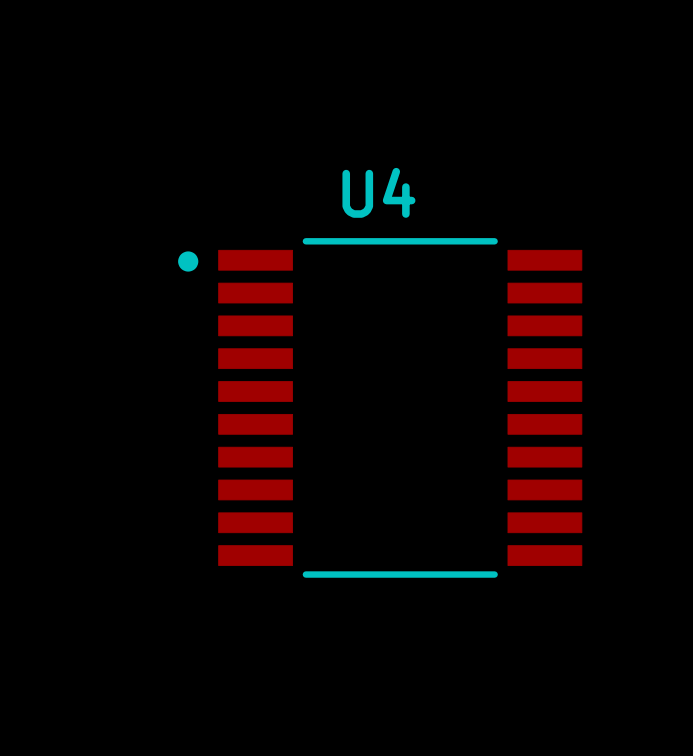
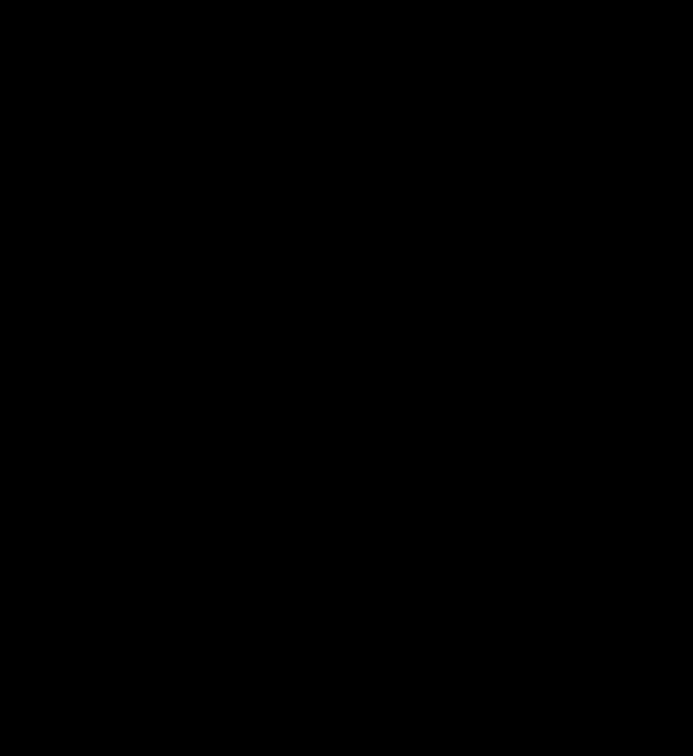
U4: (380, 407) -> none

